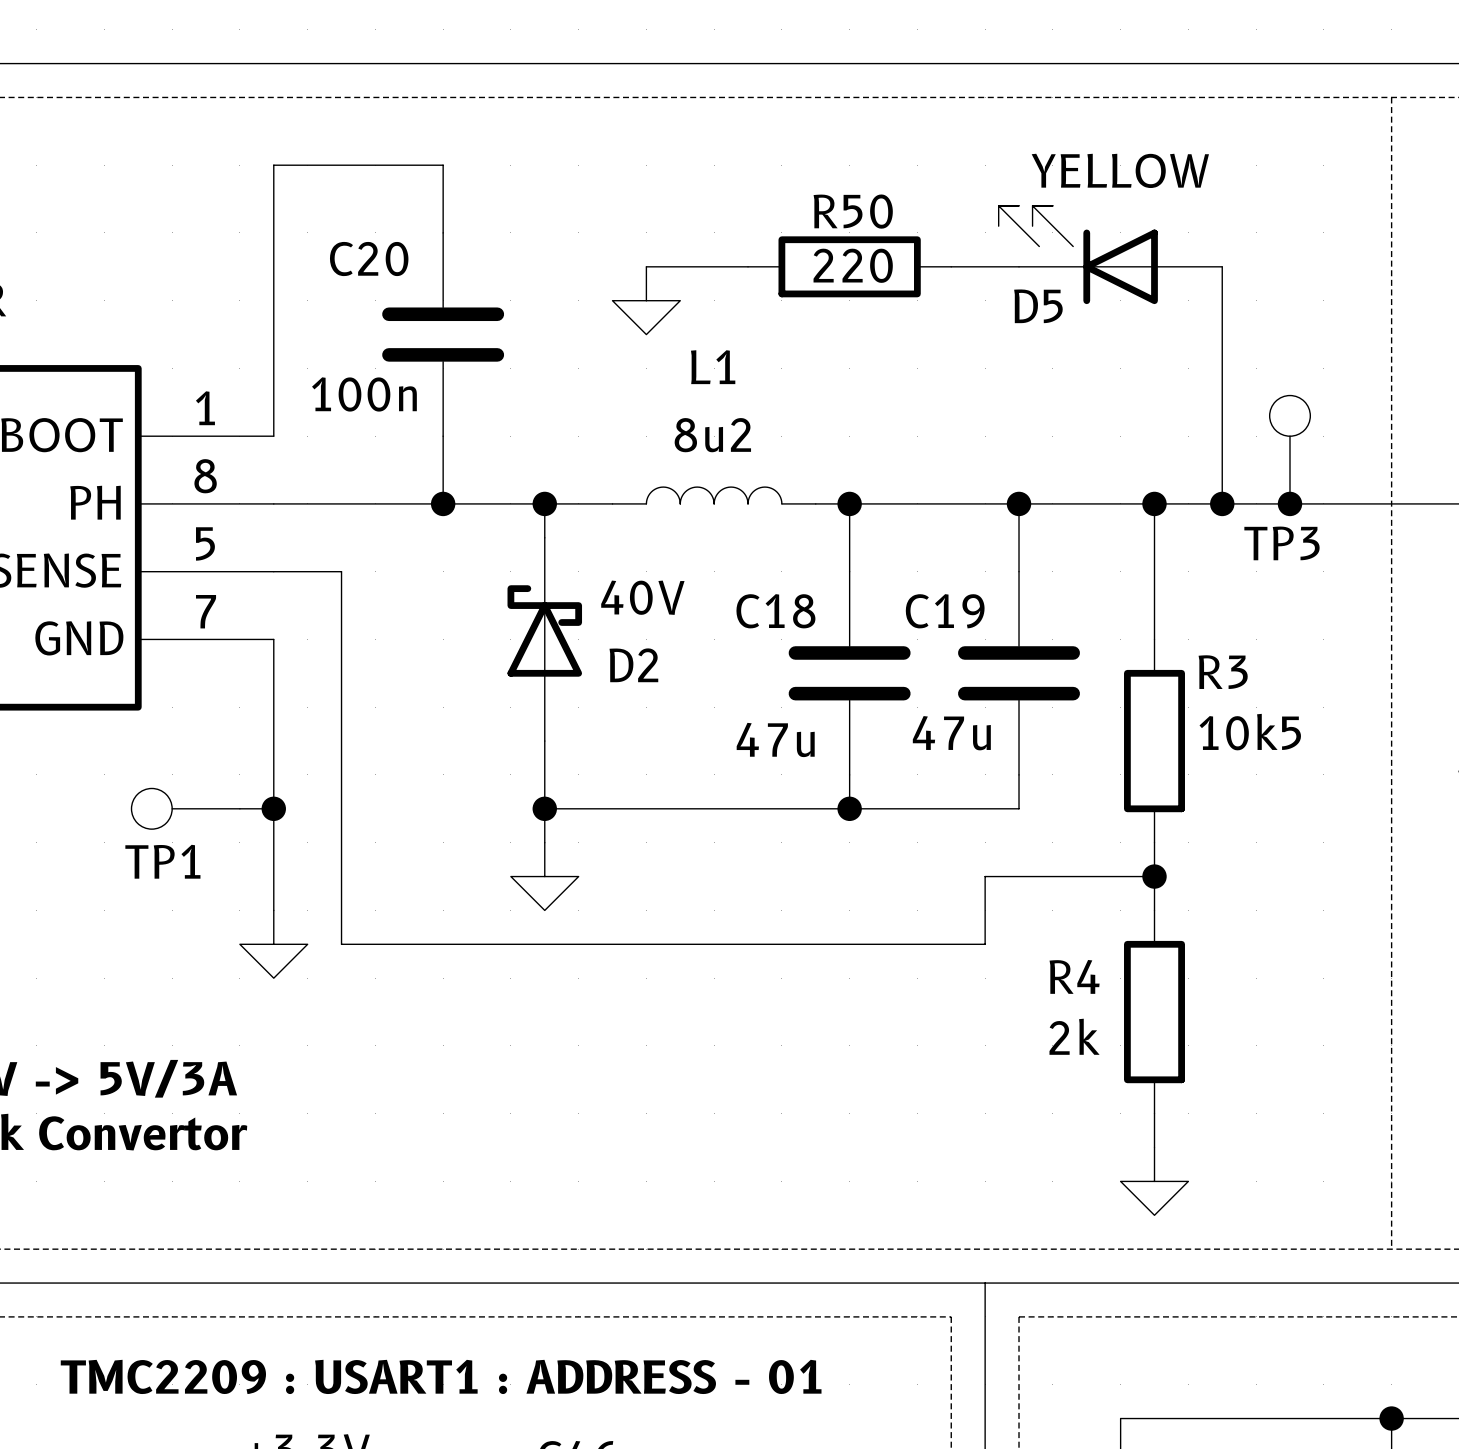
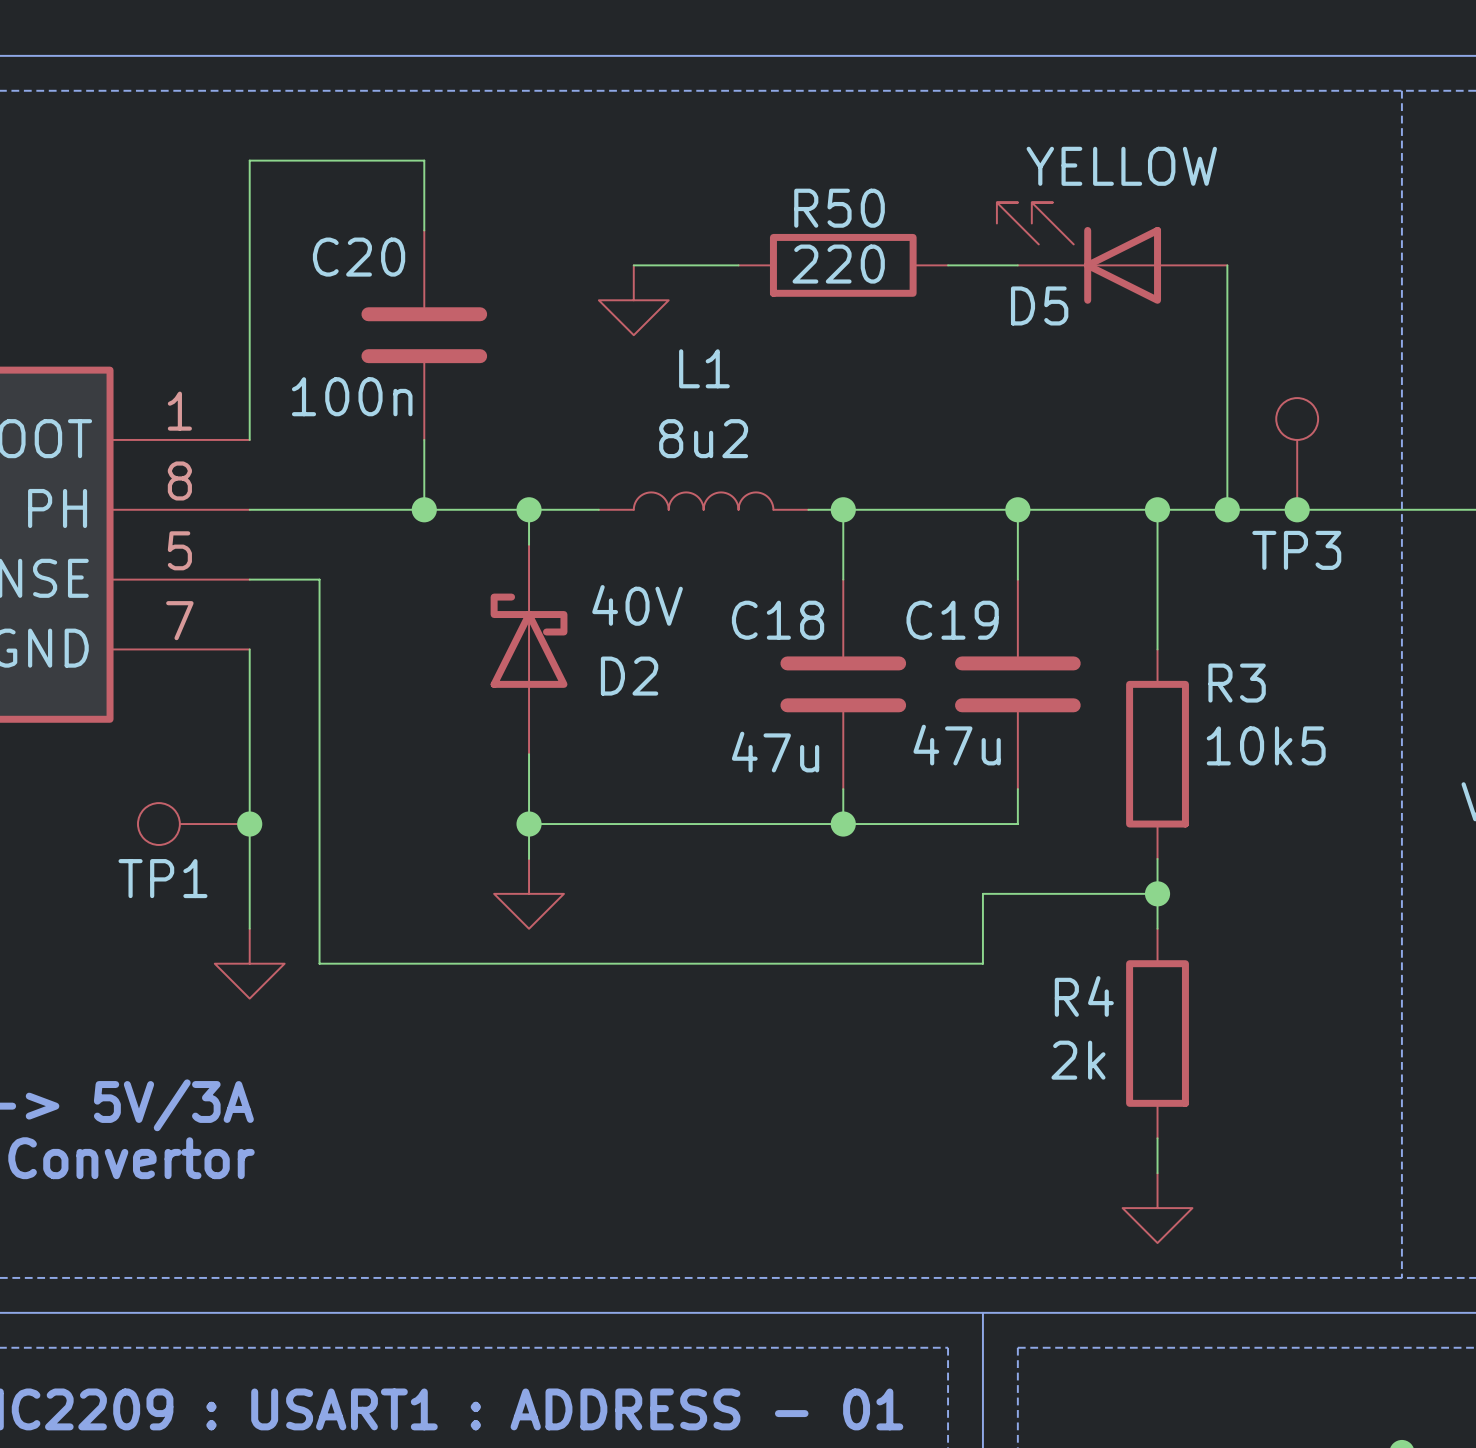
TP1 position: (185, 808) -> (193, 824)

